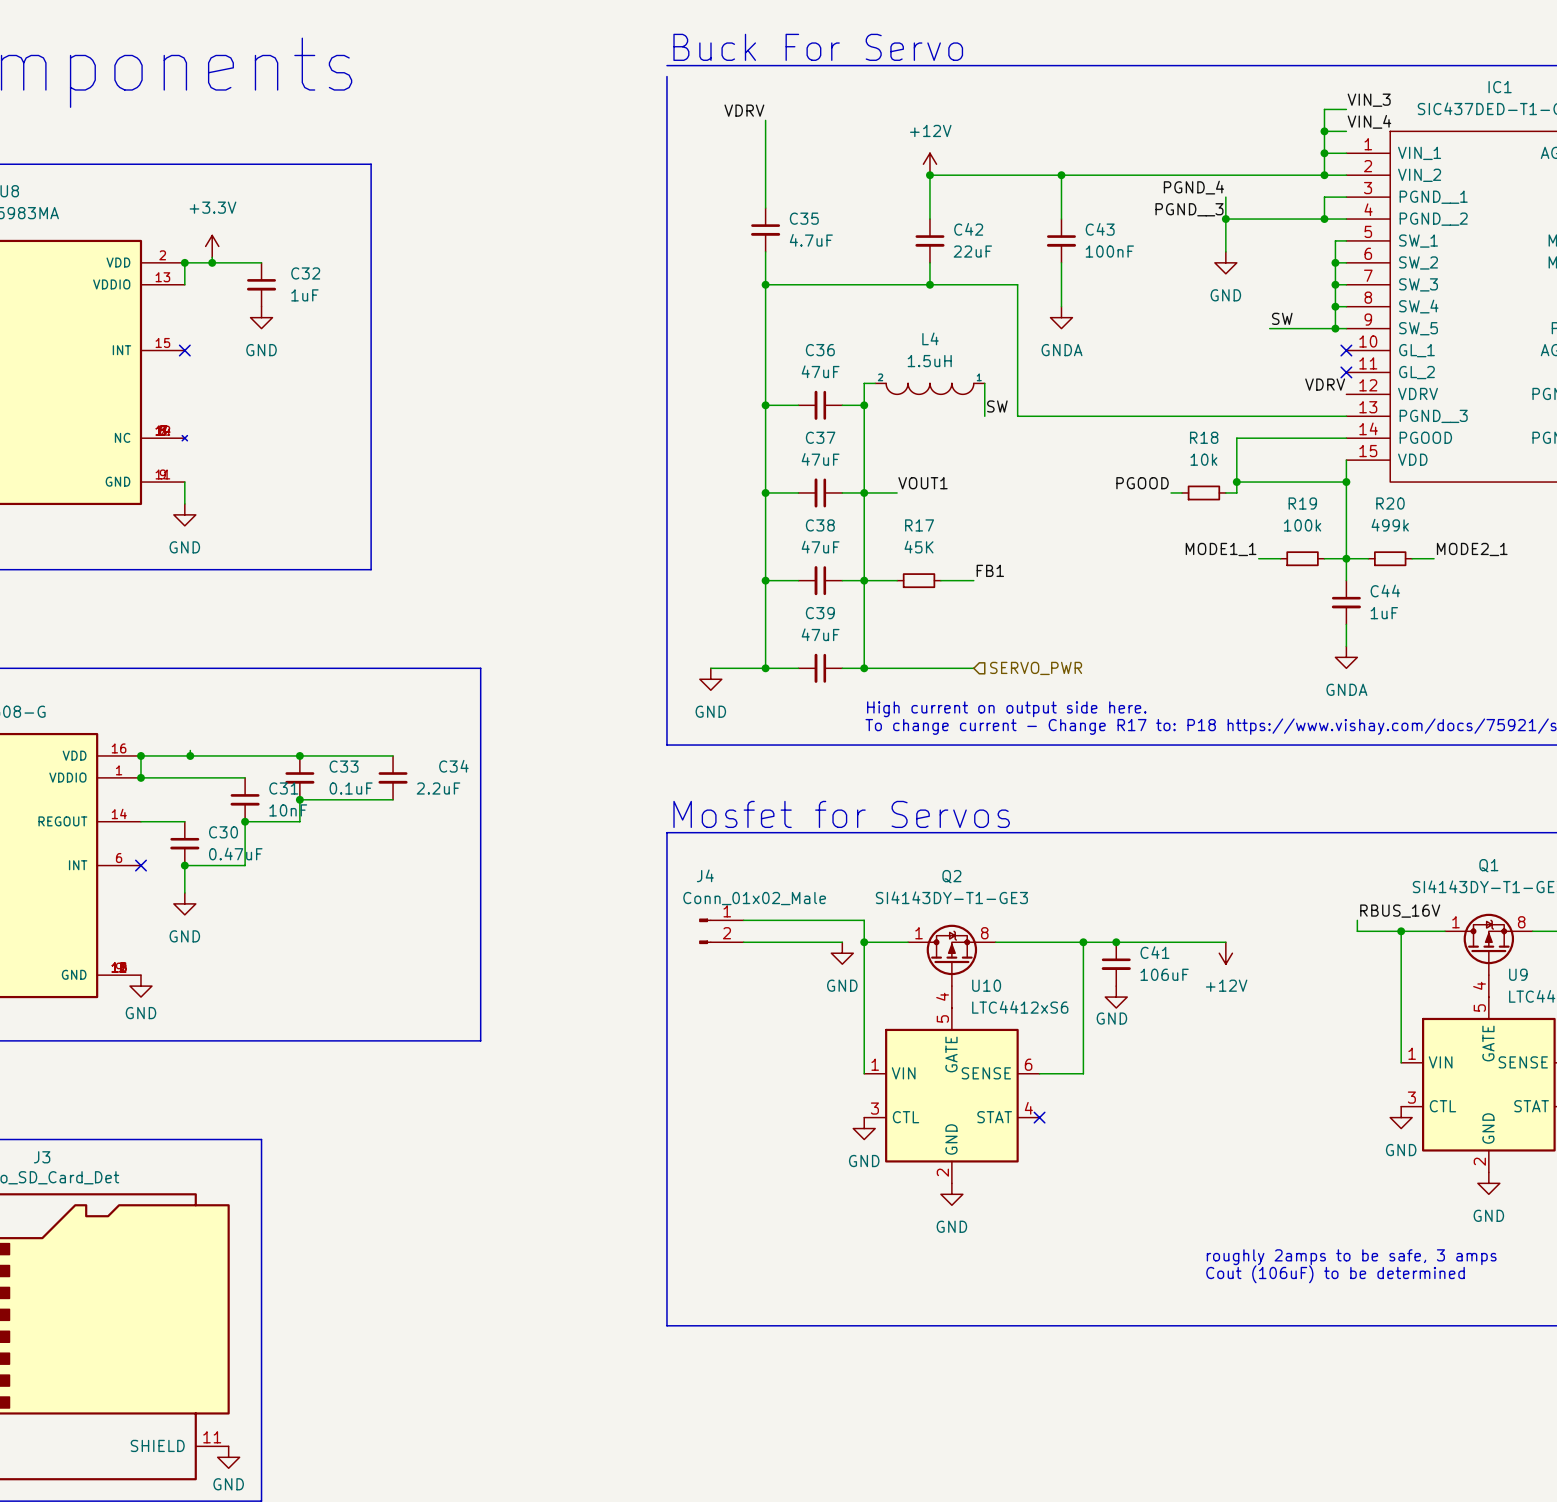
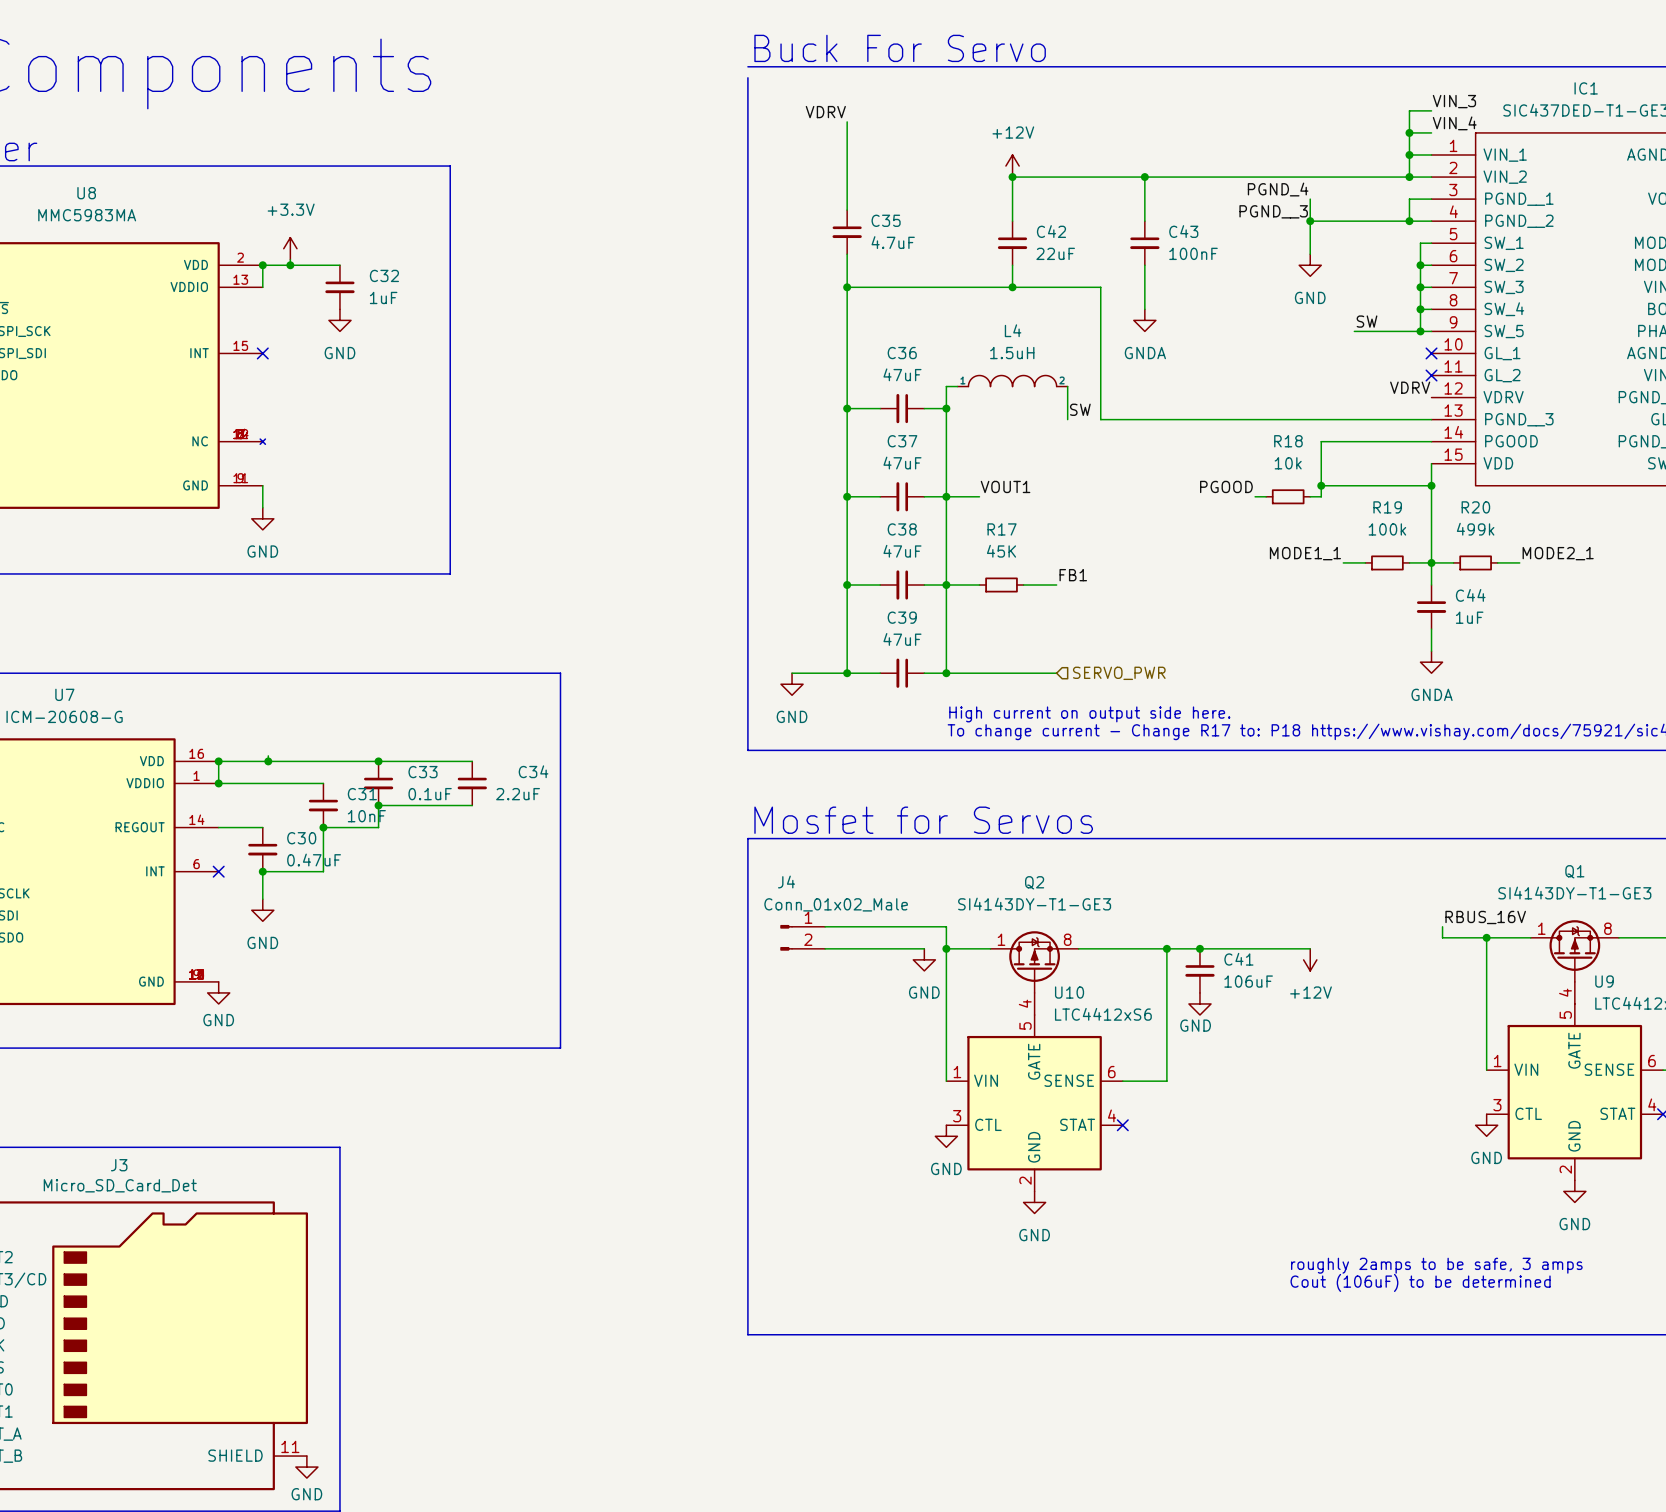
L4 rotation: 0° (929, 388) -> 180° (1012, 381)

